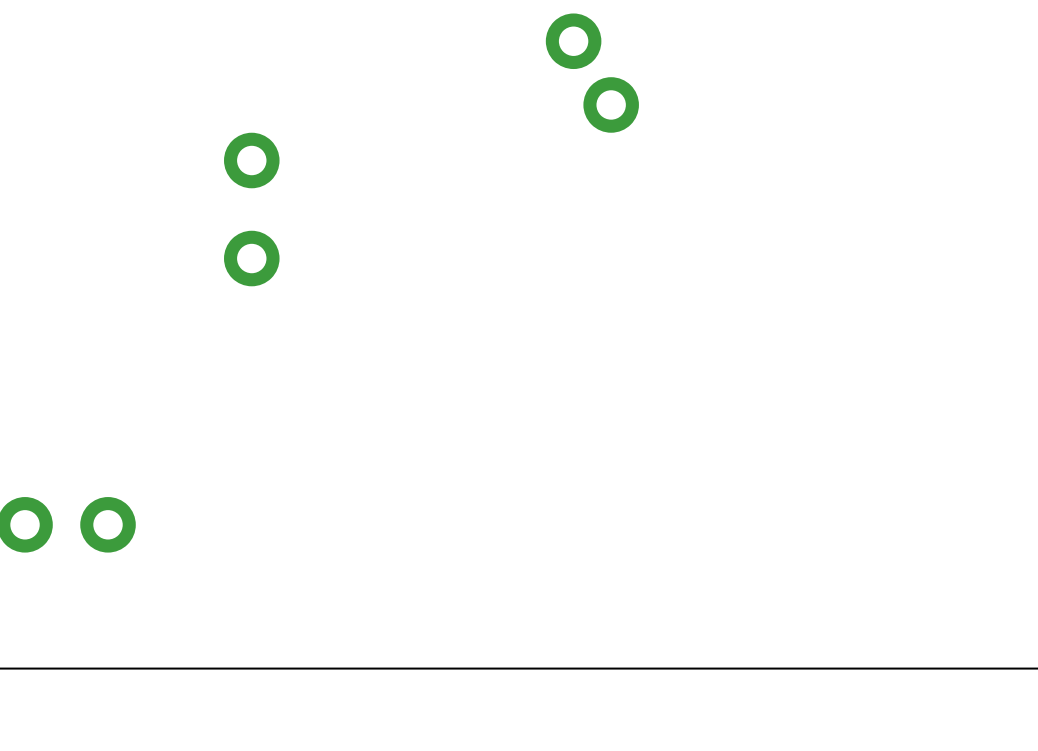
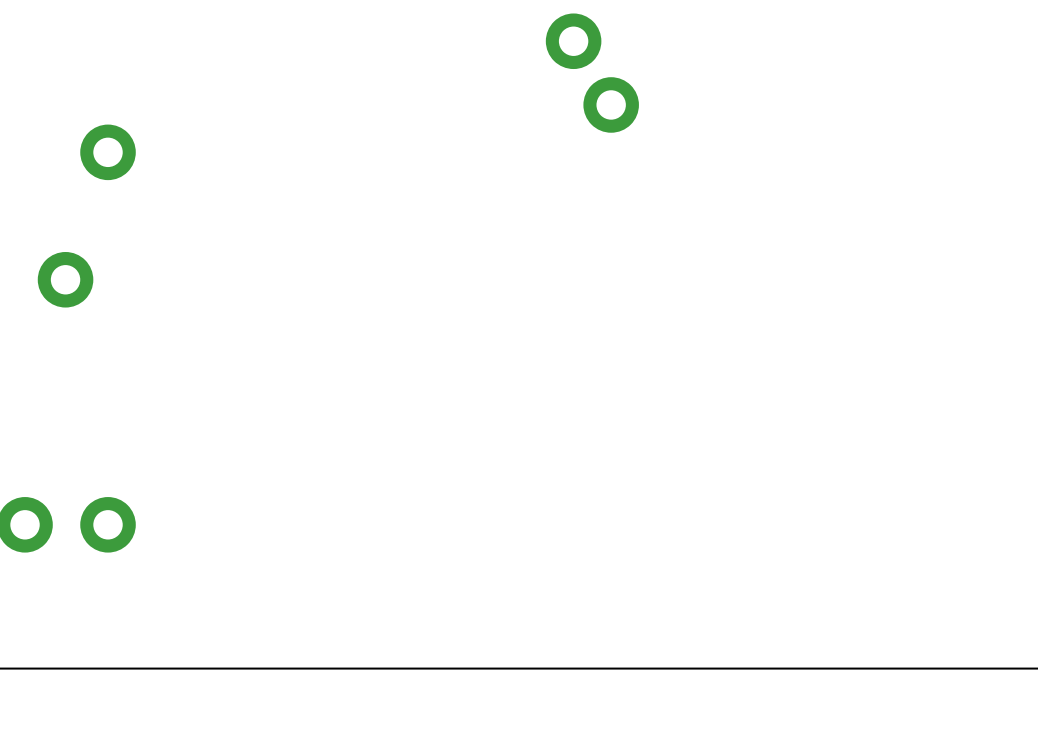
part: none -> (108, 152)
part: (251, 160) -> none
part: (251, 258) -> none
part: none -> (65, 279)

